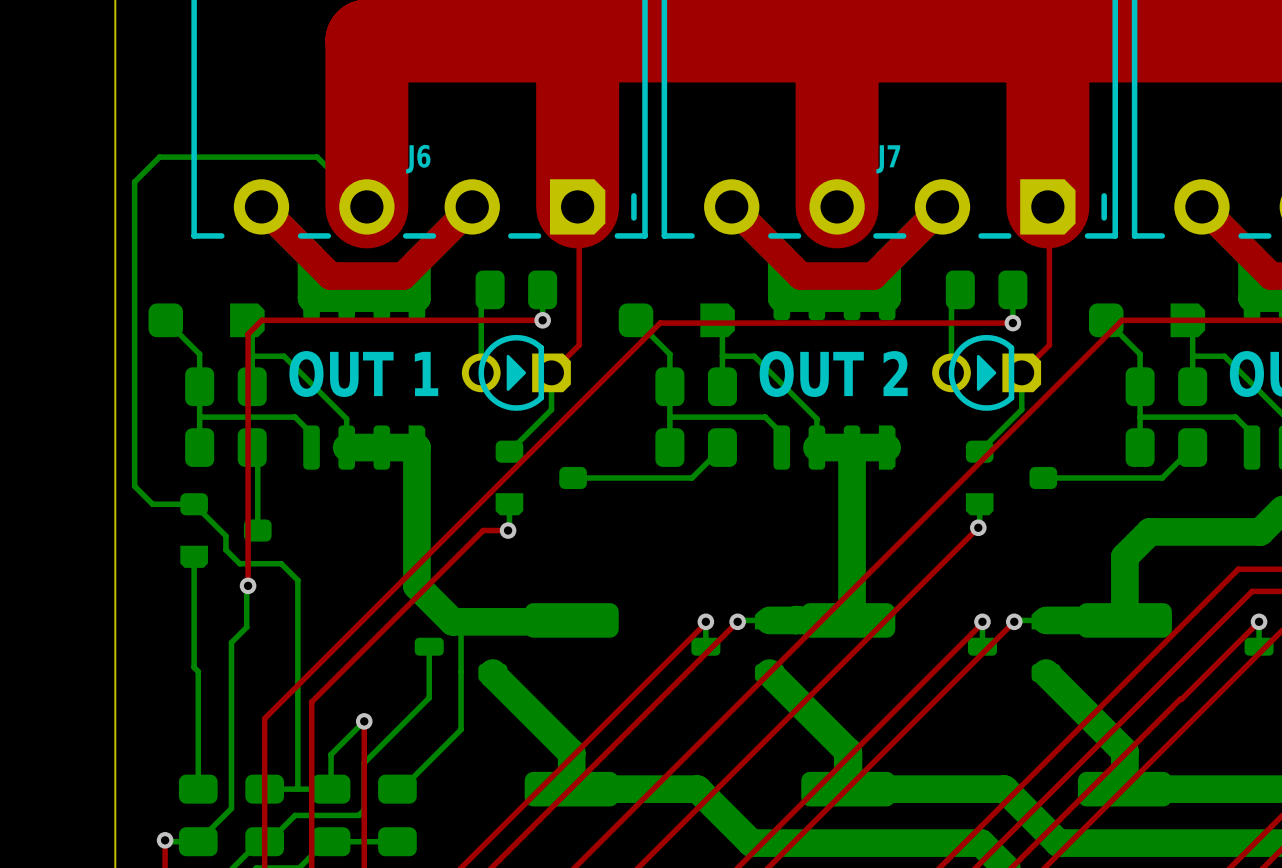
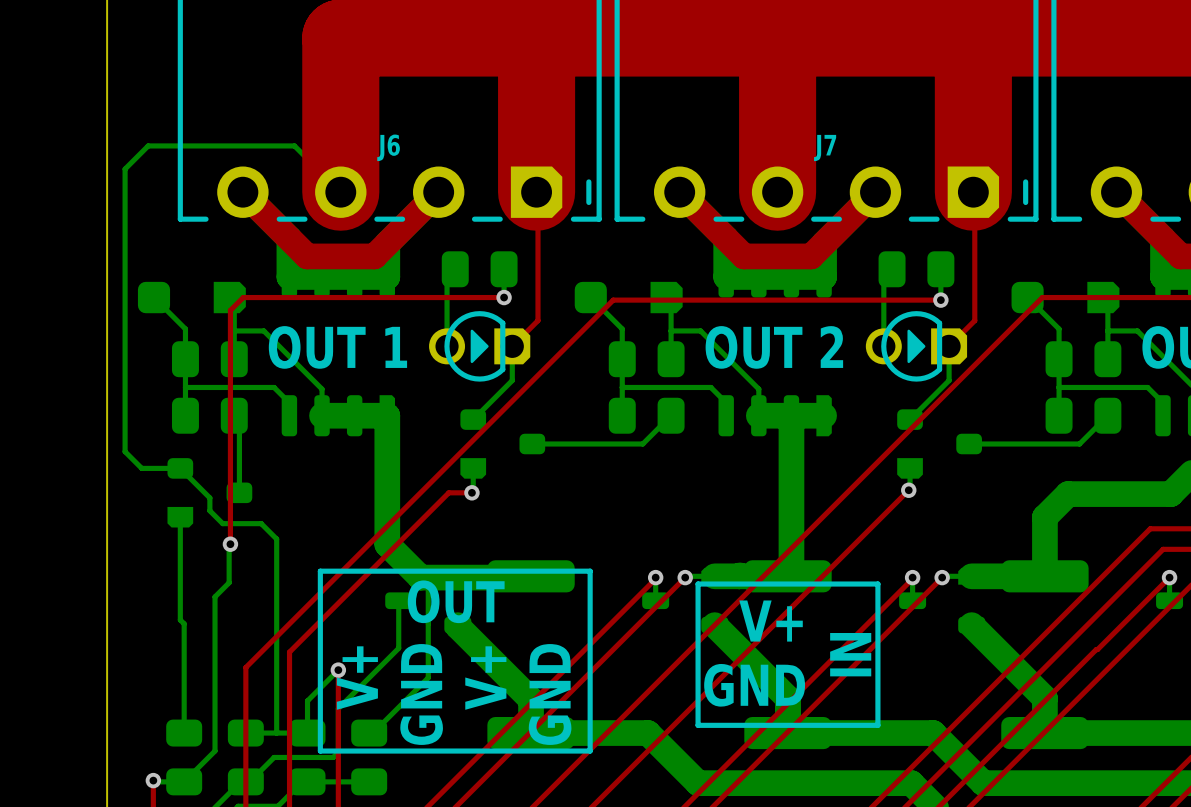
line: none -> (320, 571) (590, 571) (590, 751) (320, 751) (320, 571)
line: none -> (698, 584) (877, 584) (877, 725) (698, 725) (698, 584)
text: none -> OUT (456, 601)
text: none -> V+ (771, 621)
text: none -> IN (850, 654)
text: none -> V+ (357, 678)
text: none -> V+ (485, 678)
text: none -> GND (754, 685)
text: none -> GND (421, 694)
text: none -> GND (550, 694)

